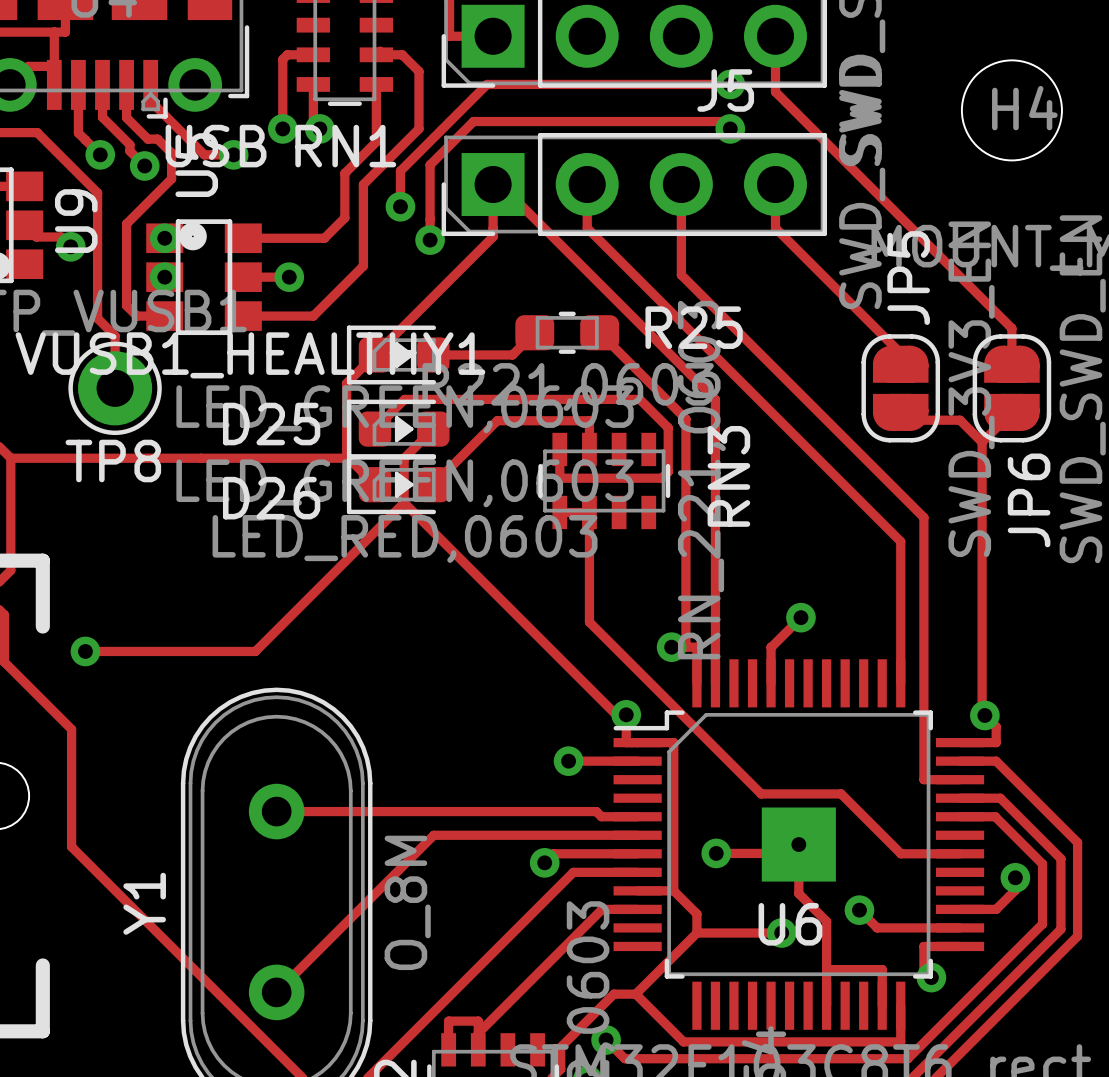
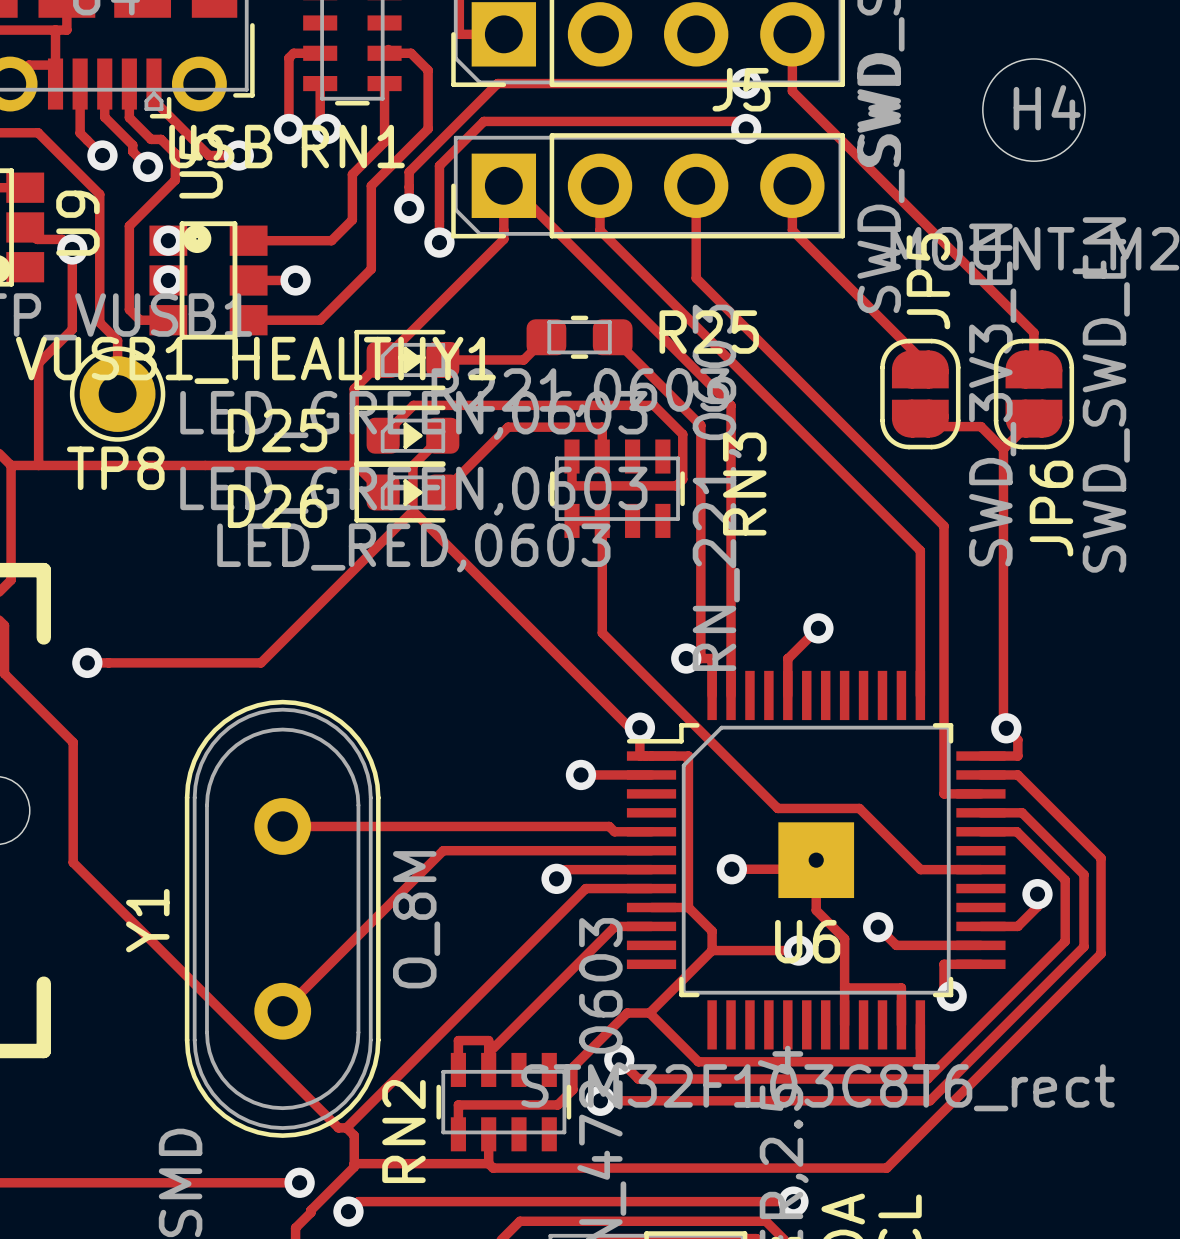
track: none -> (72, 249) (72, 329) (38, 363) (38, 465)

